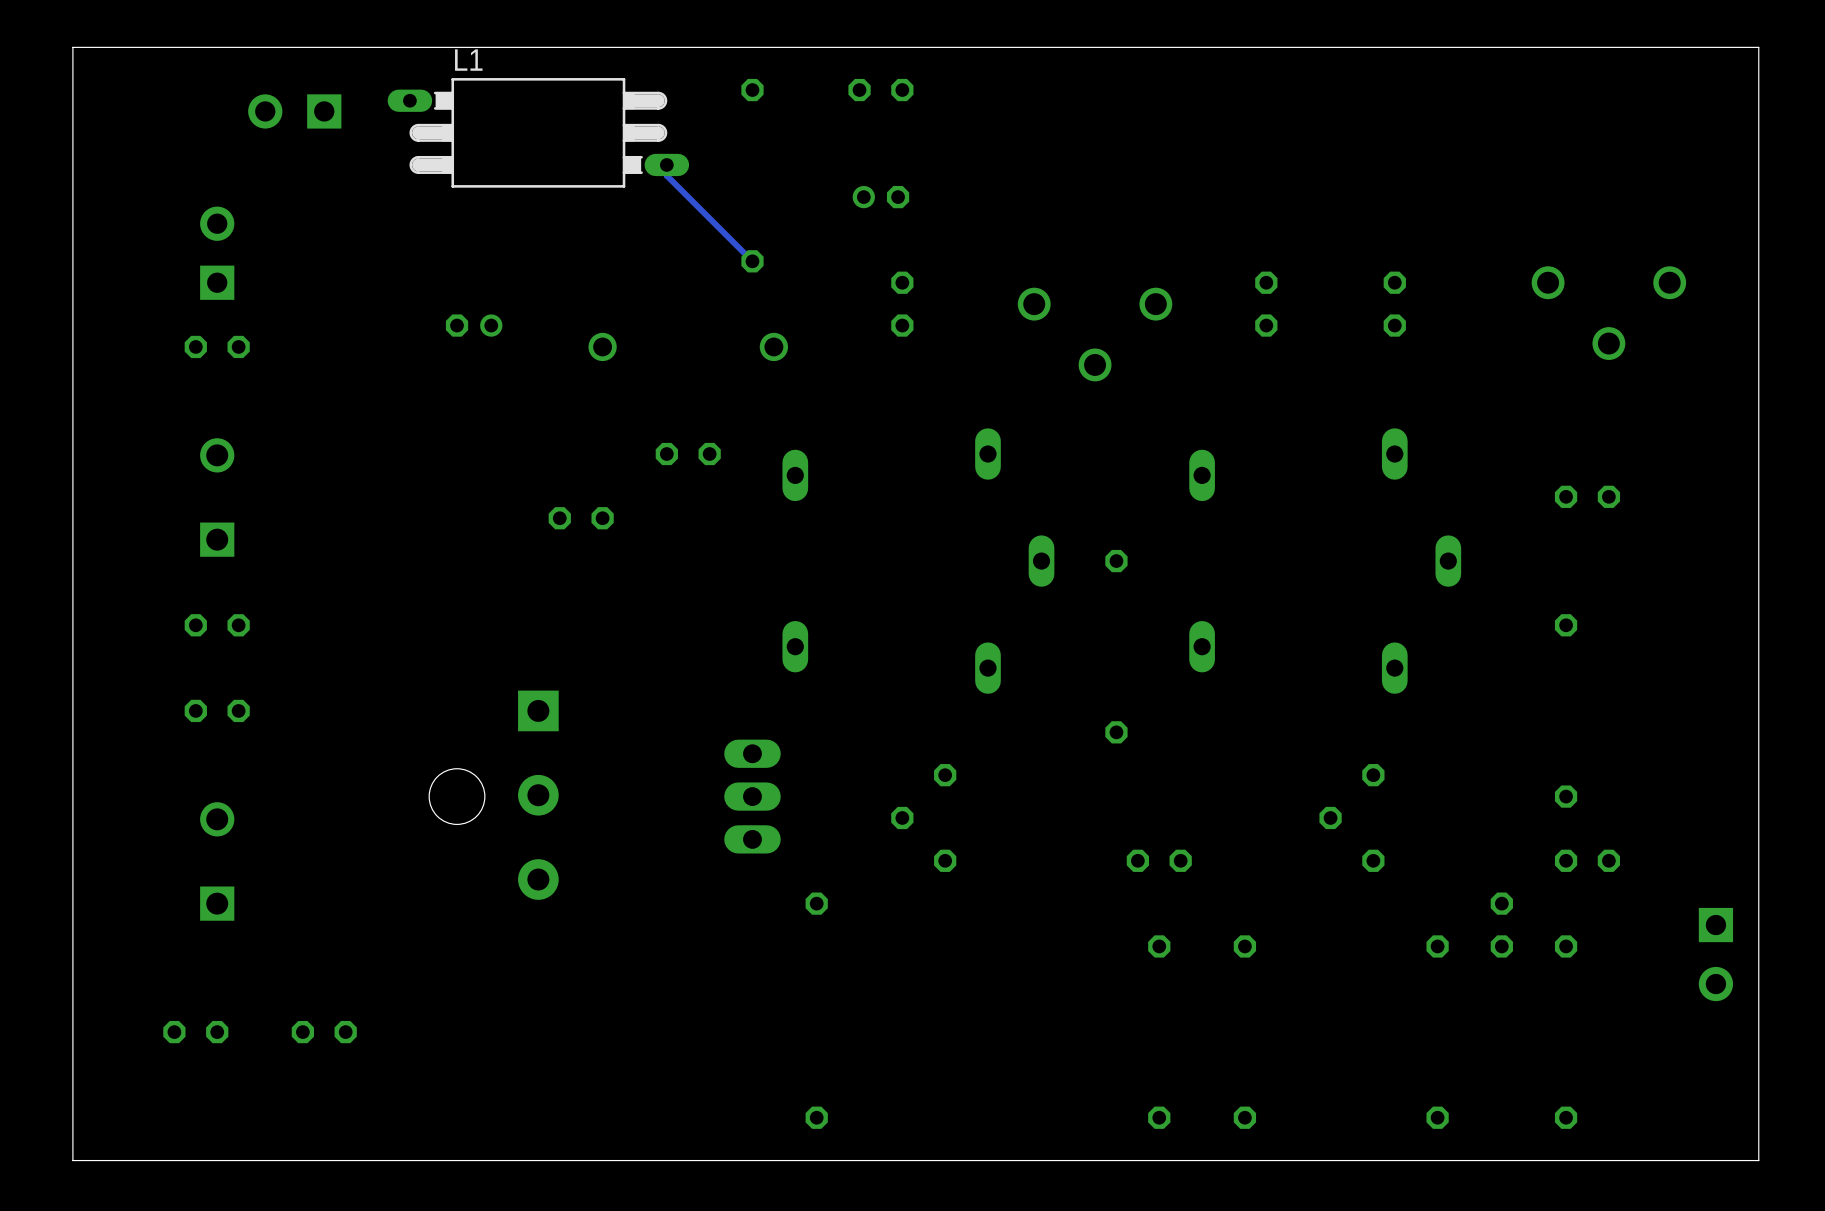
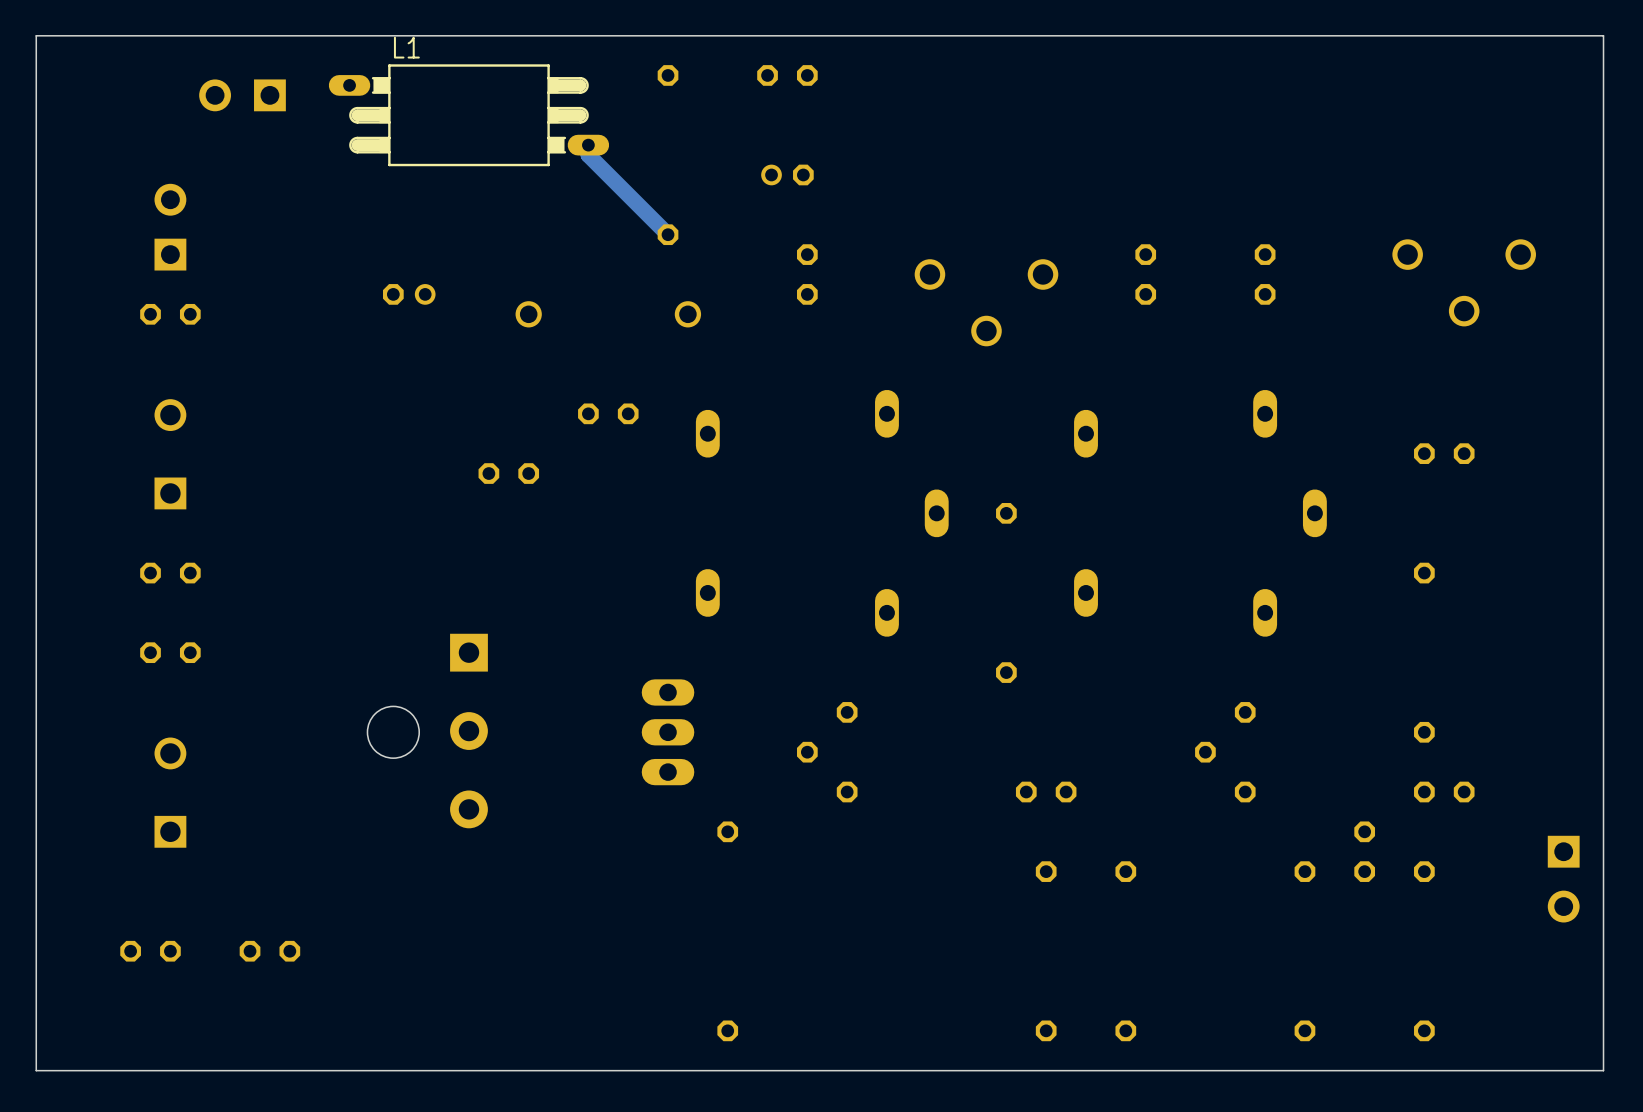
track width: thin (666, 164) (666, 175) (752, 261) -> thick (588, 145) (588, 155) (668, 234)

